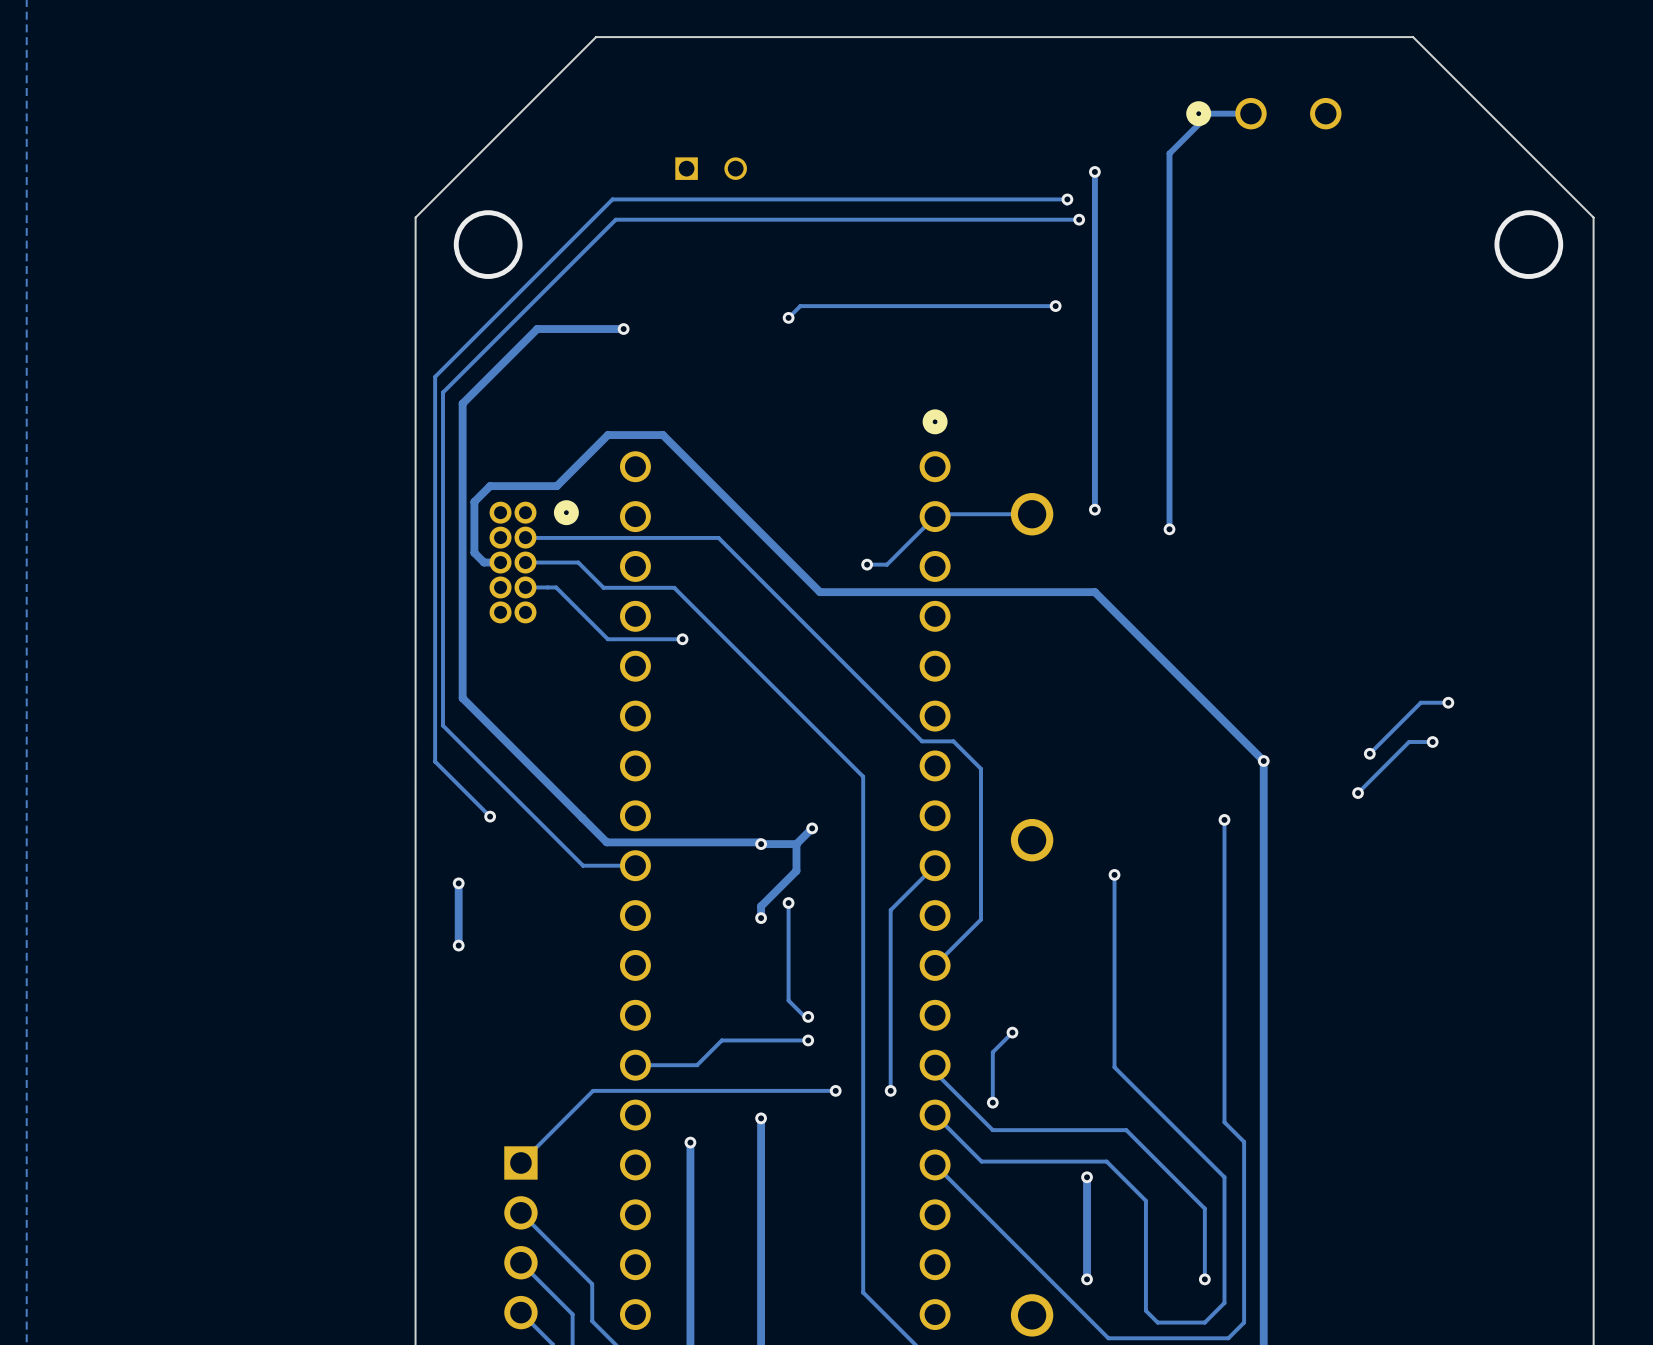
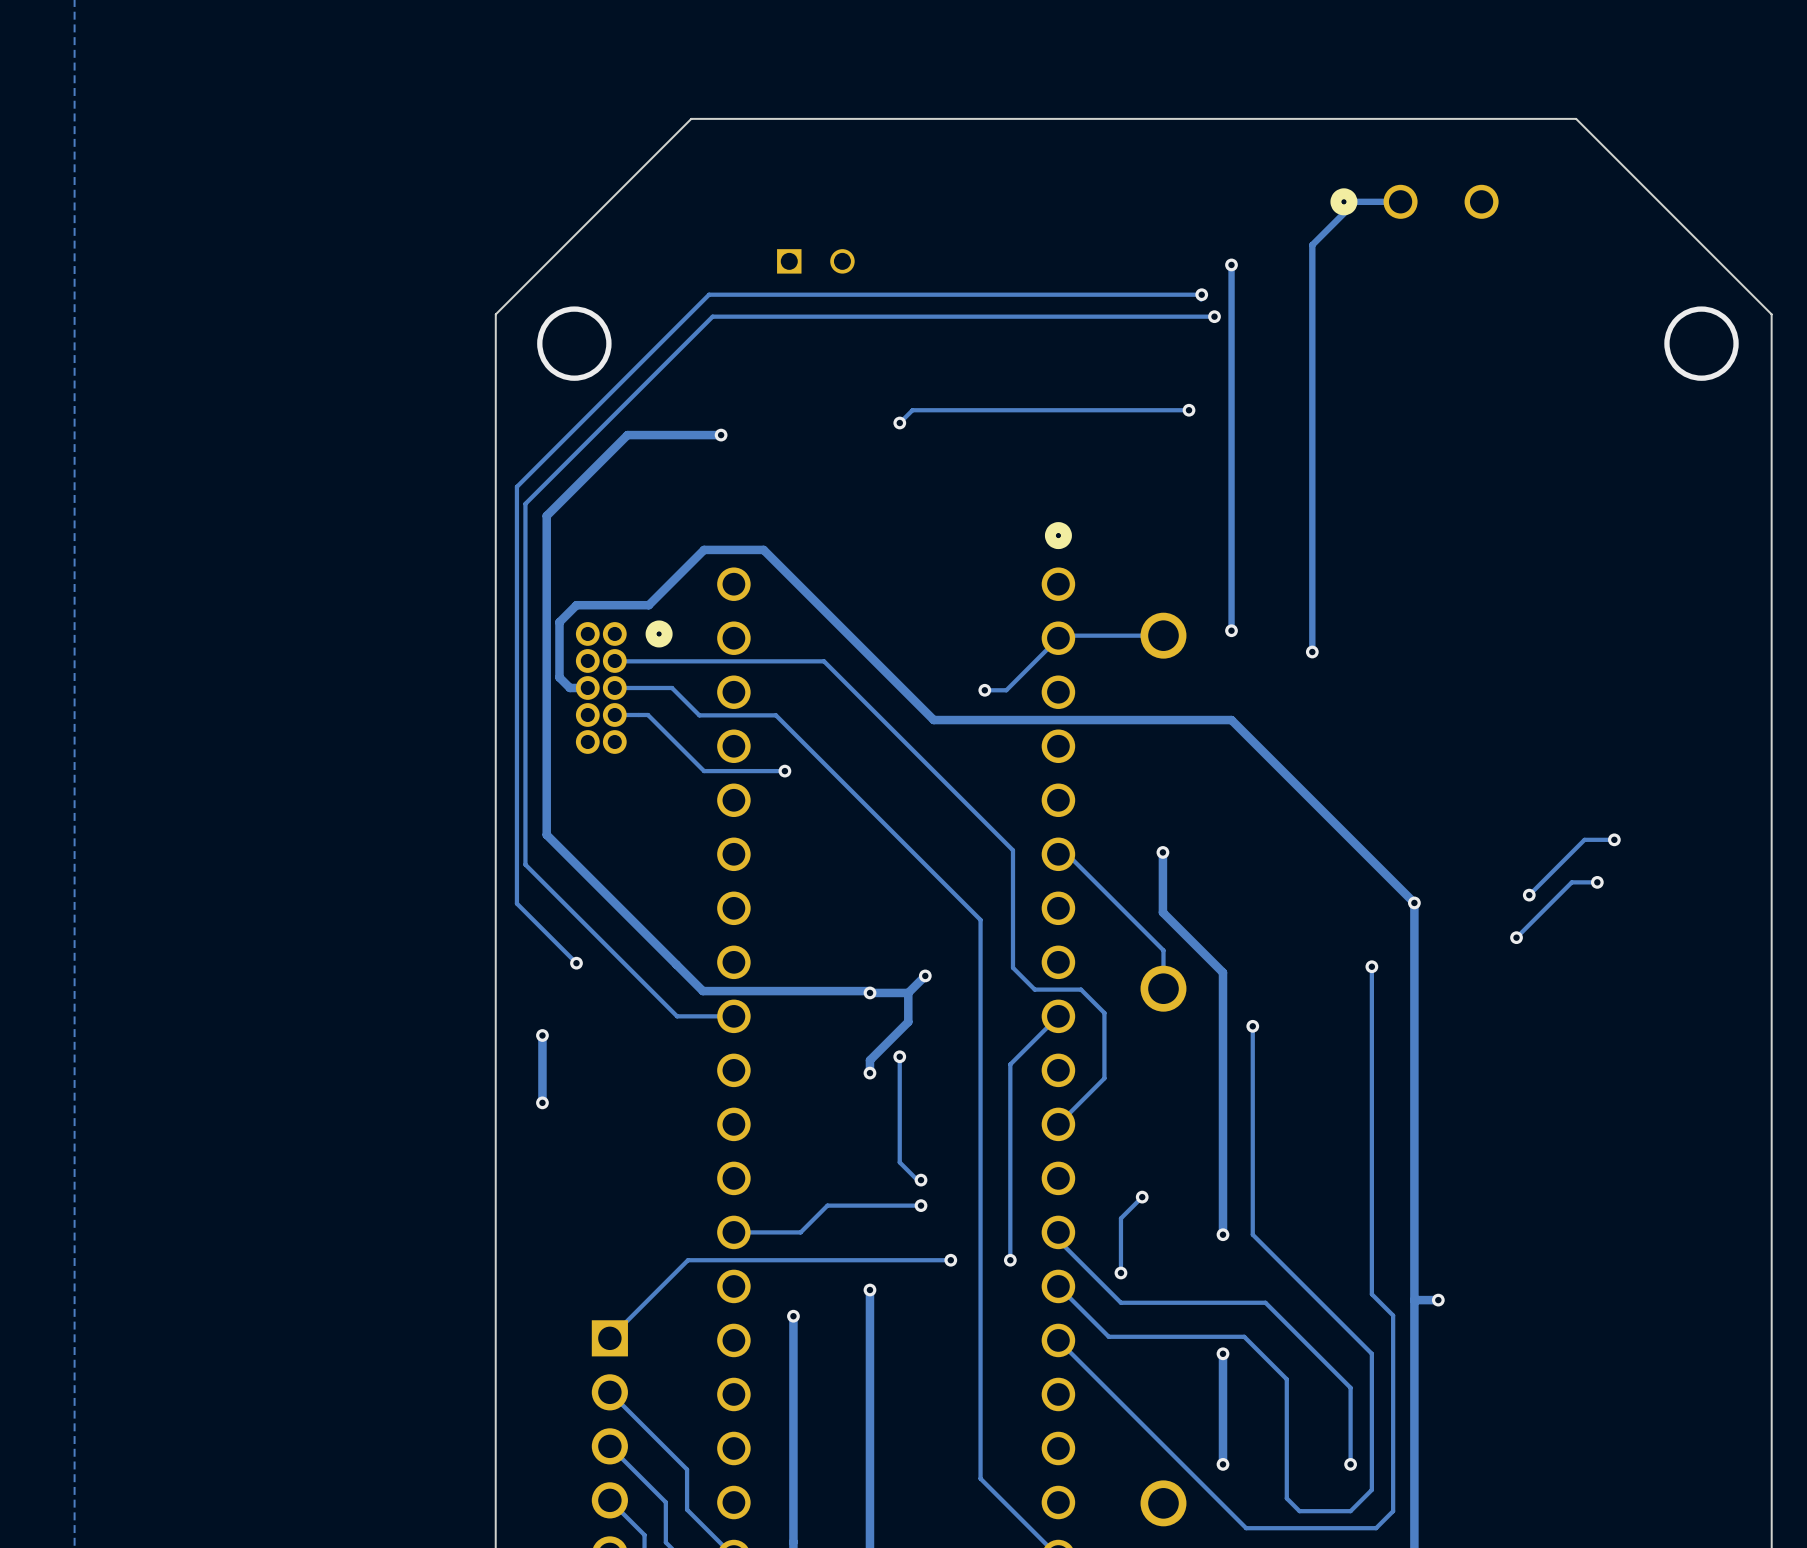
track: (893, 712) (922, 741) (953, 741) (981, 768) (981, 919) (977, 922) -> (1012, 850) (1012, 967) (1034, 989) (1081, 989) (1104, 1013) (1104, 1078)
track: none -> (1162, 852) (1162, 912) (1223, 972) (1223, 1234)
via: none -> (1162, 852)
track: none -> (1067, 854) (1163, 950) (1163, 988)
via: none -> (1223, 1234)
track: none -> (1438, 1300) (1414, 1300)
via: none -> (1438, 1300)

